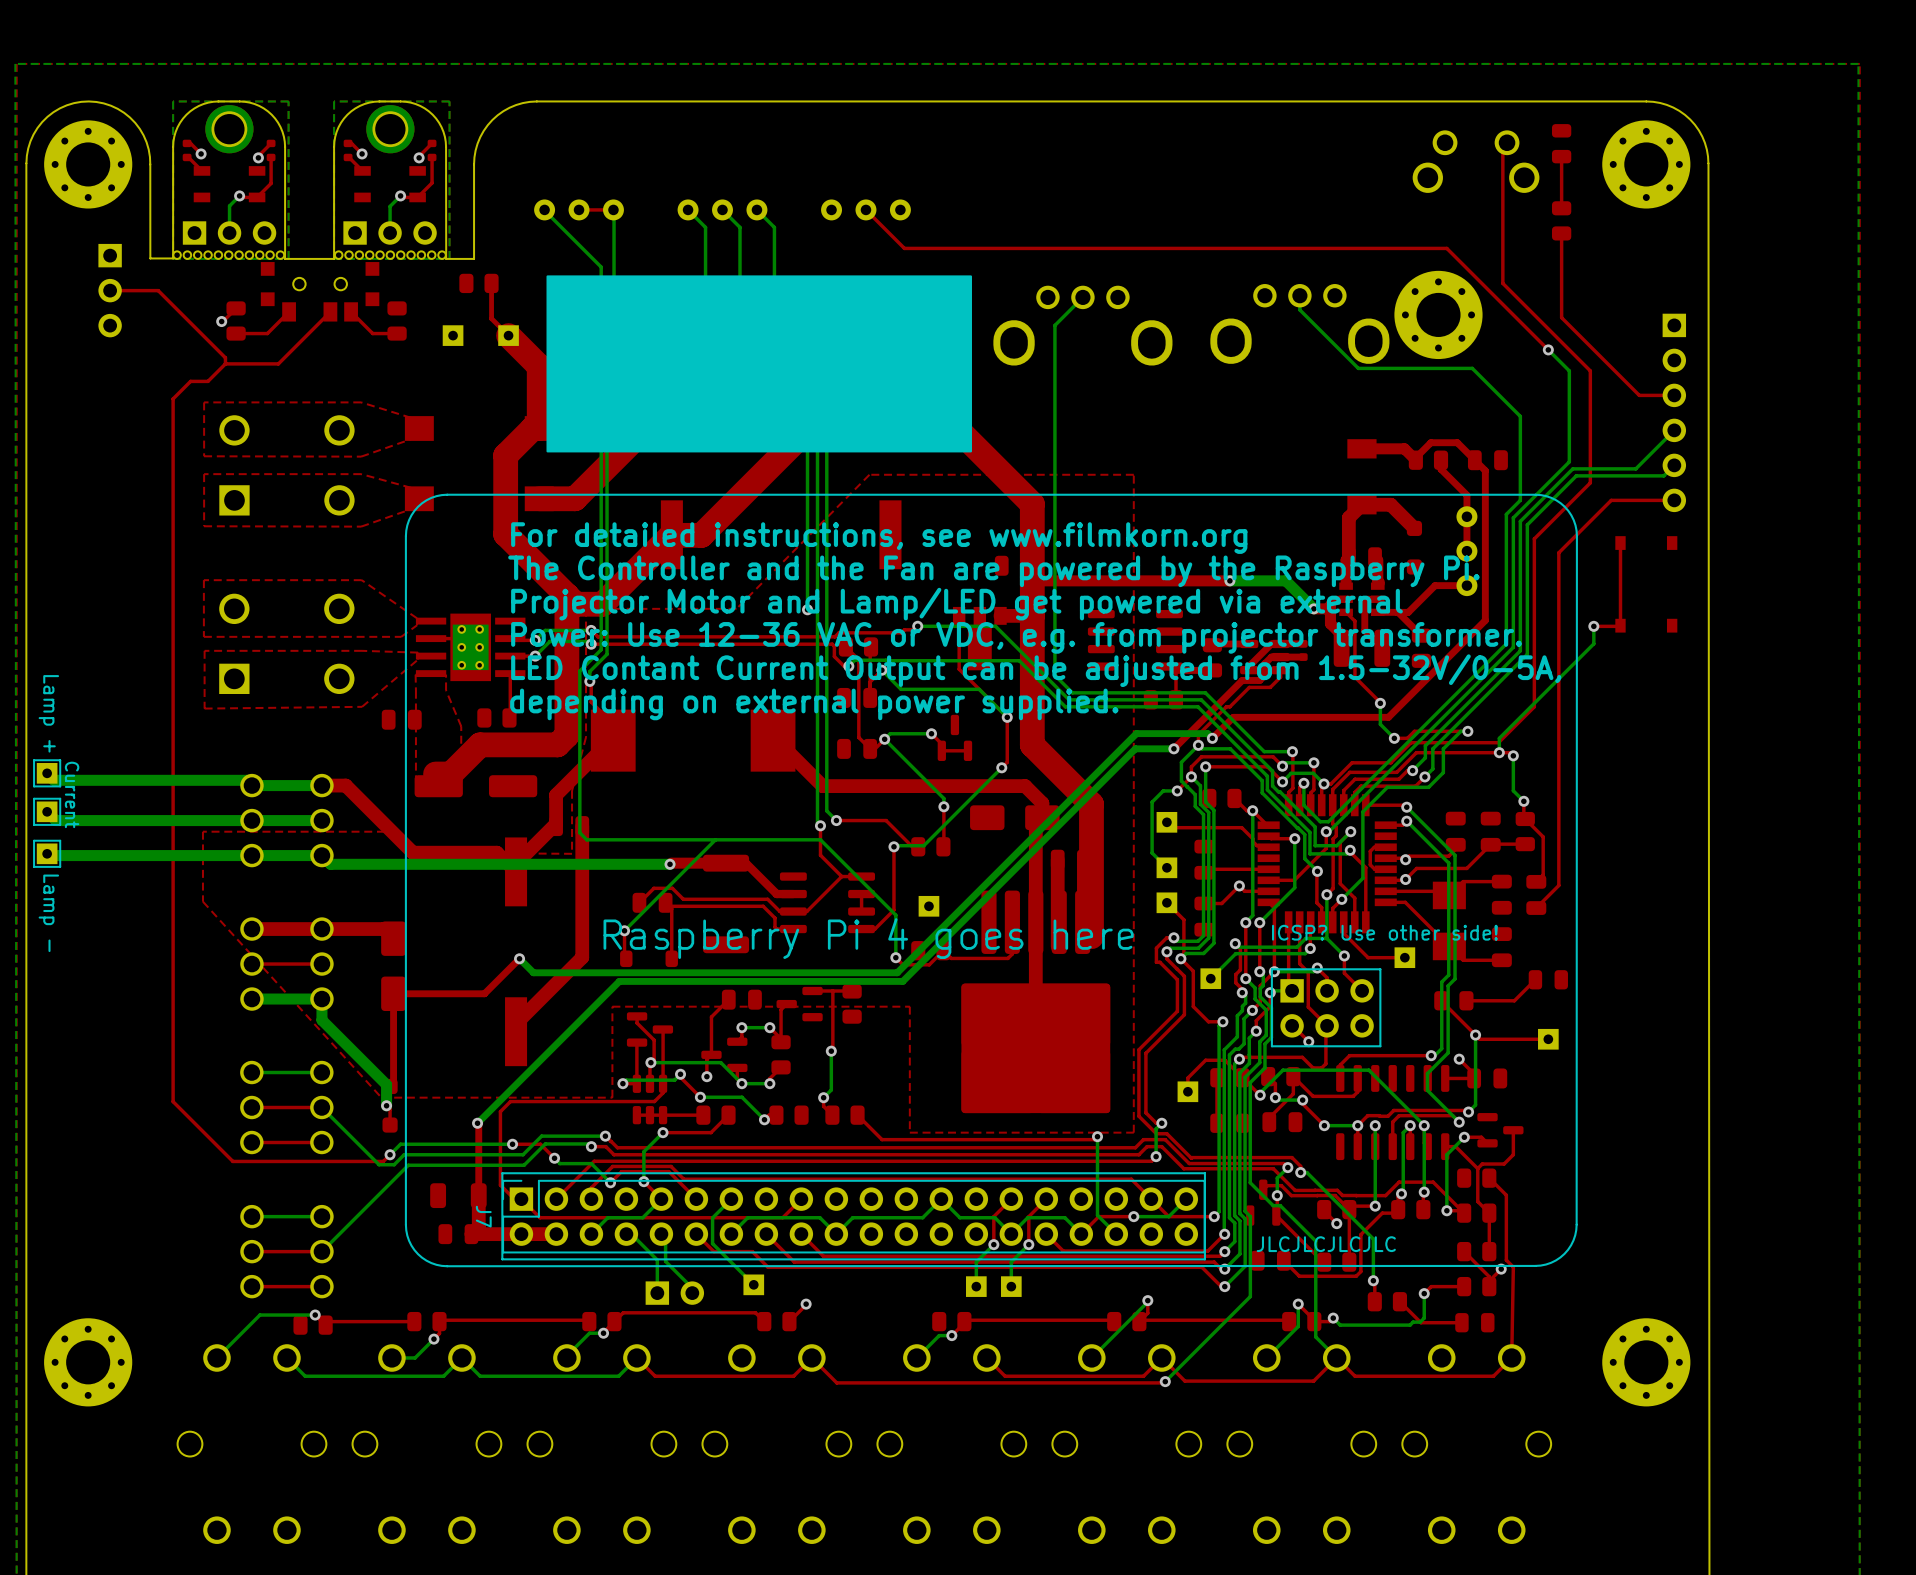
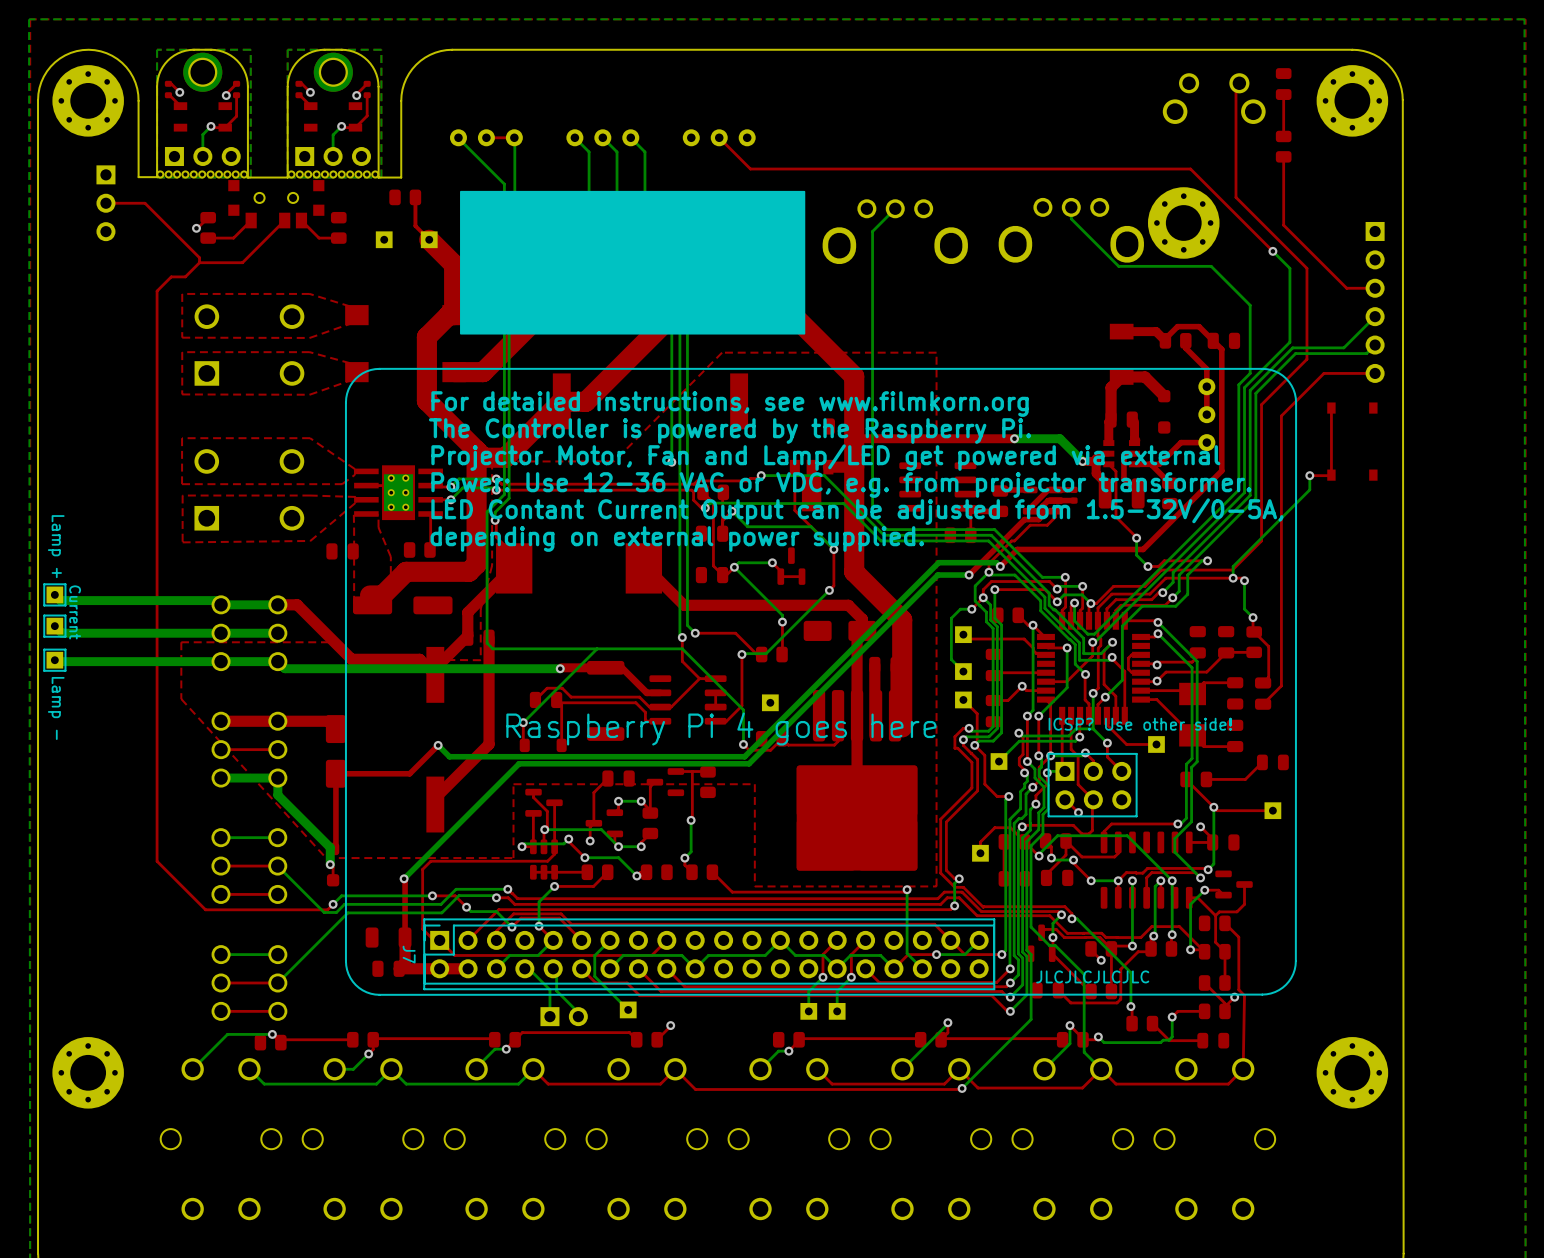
text: The Controller and the Fan are powered by the Raspberry Pi. (993, 571) -> The Controller is powered by the Raspberry Pi. (730, 431)
text: Projector Motor and Lamp/LED get powered via external (956, 604) -> Projector Motor, Fan and Lamp/LED get powered via external (825, 457)

